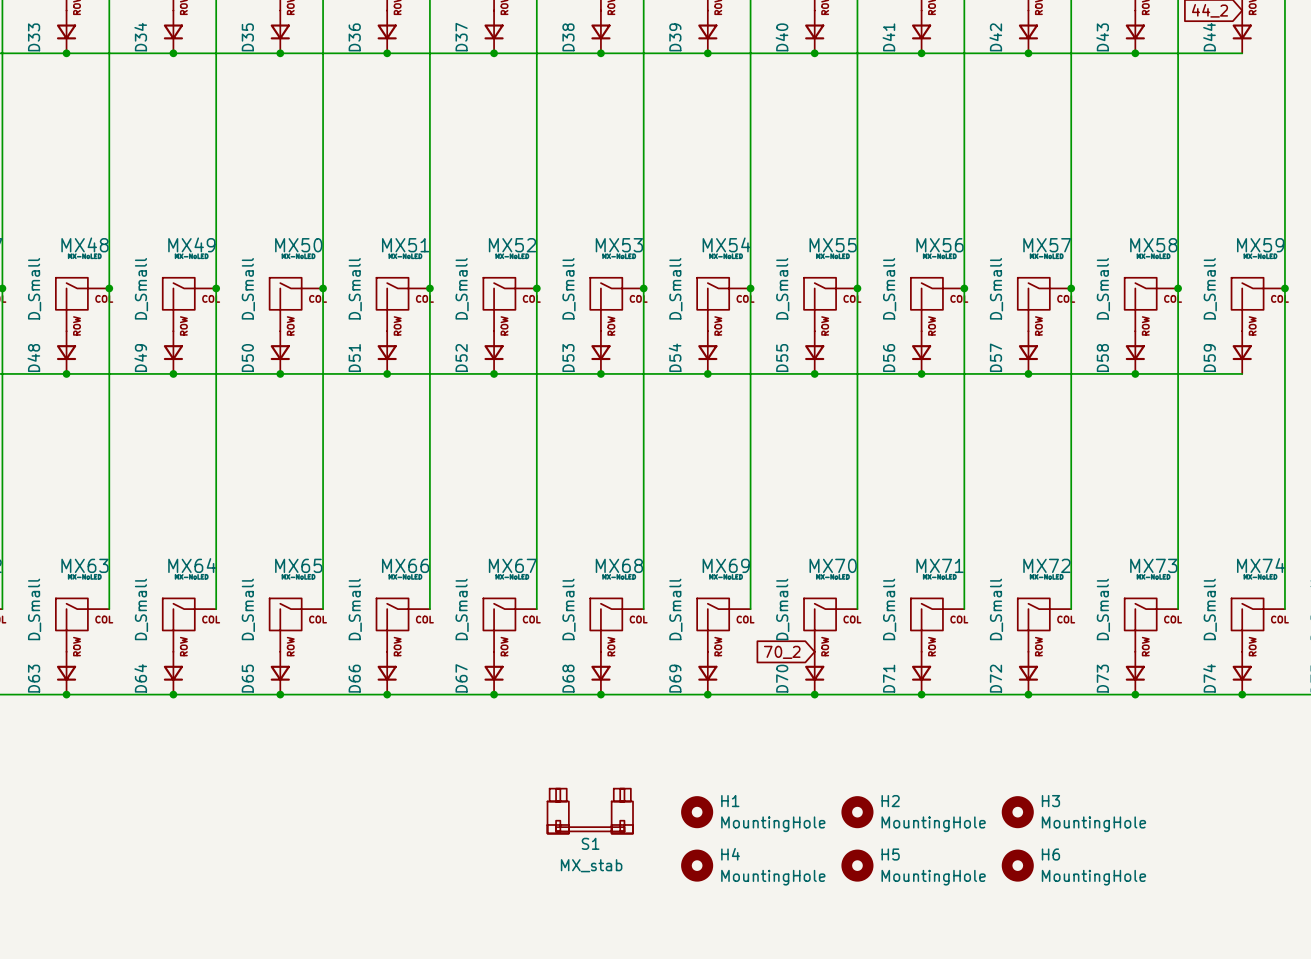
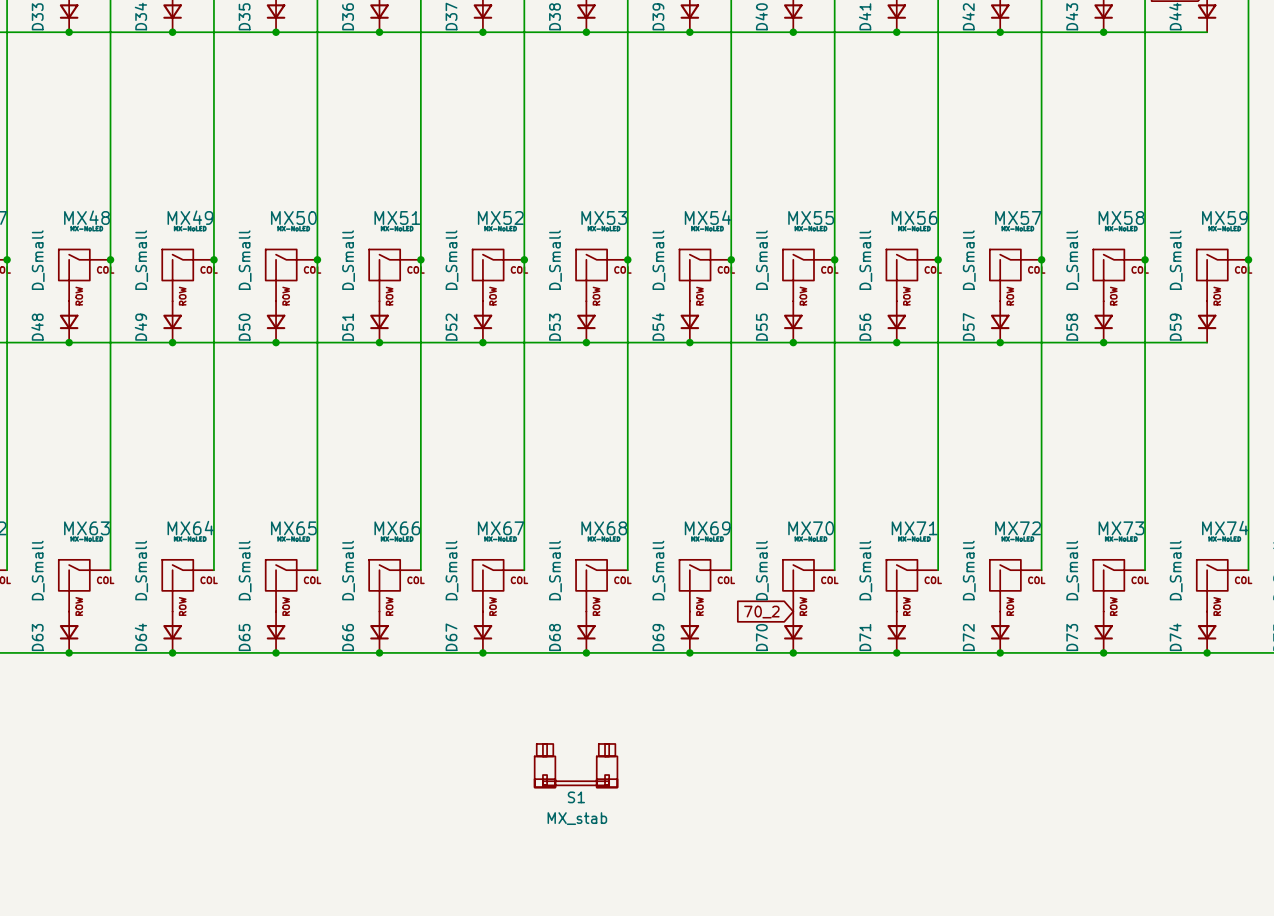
H1: MountingHole (697, 812) -> none
H2: MountingHole (857, 812) -> none
H3: MountingHole (1017, 812) -> none
H4: MountingHole (697, 865) -> none
H5: MountingHole (857, 865) -> none
H6: MountingHole (1017, 865) -> none

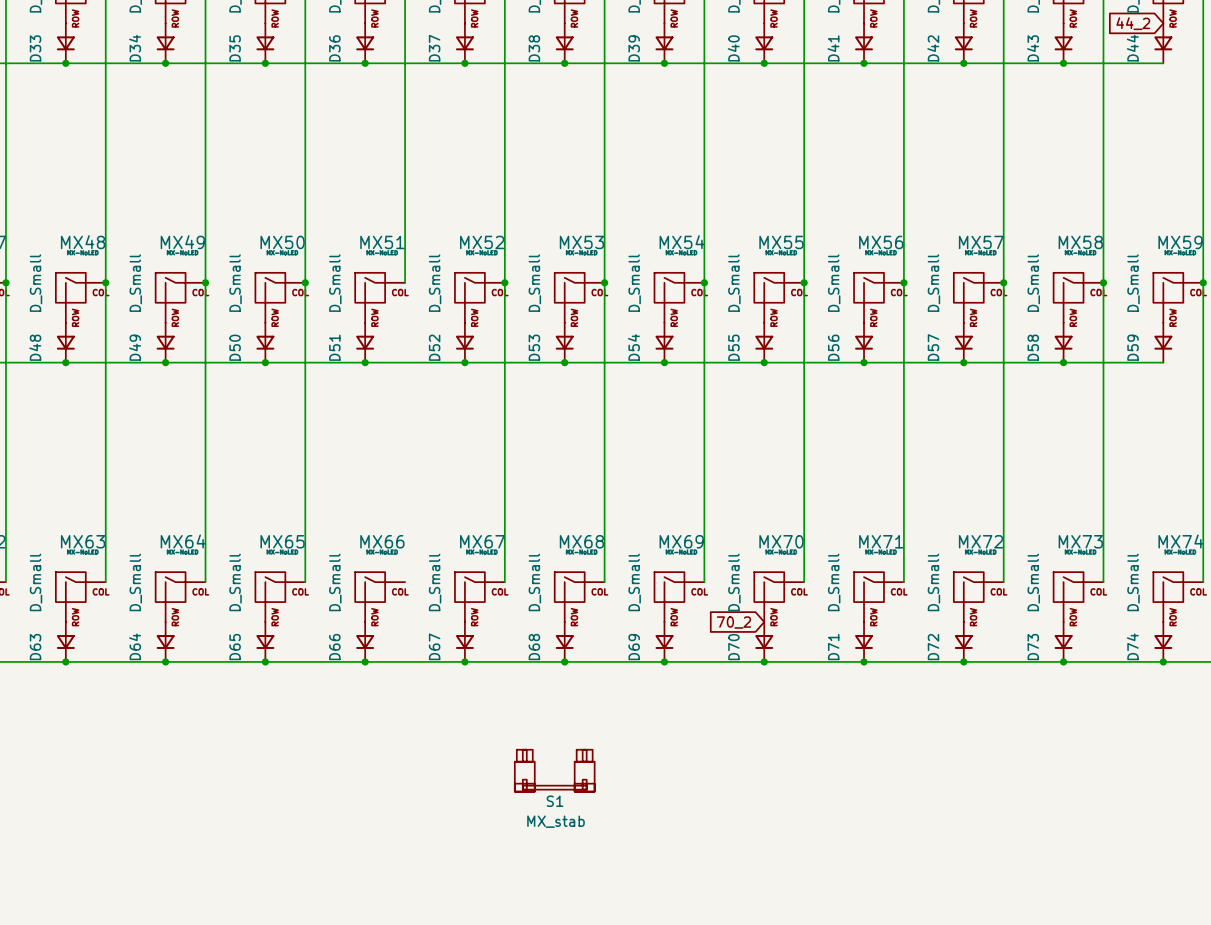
wire: (420, 259) (420, 570) -> none
junction: (420, 259) -> none

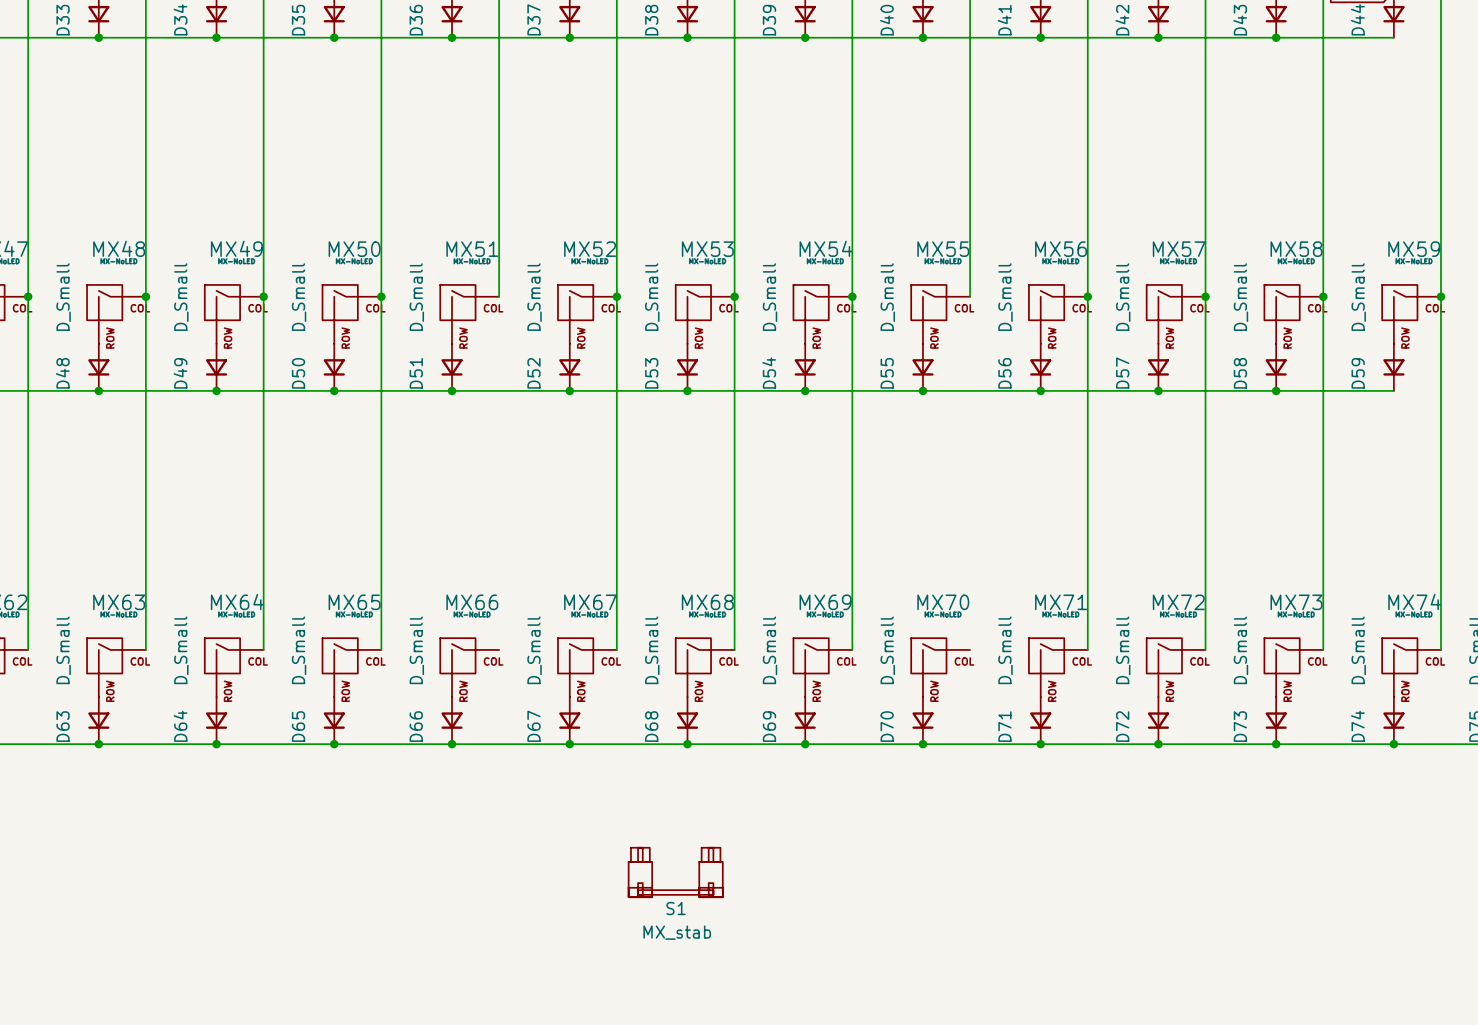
wire: (804, 282) (804, 582) -> none
junction: (804, 282) -> none
global label: 70_2 (733, 622) -> none

